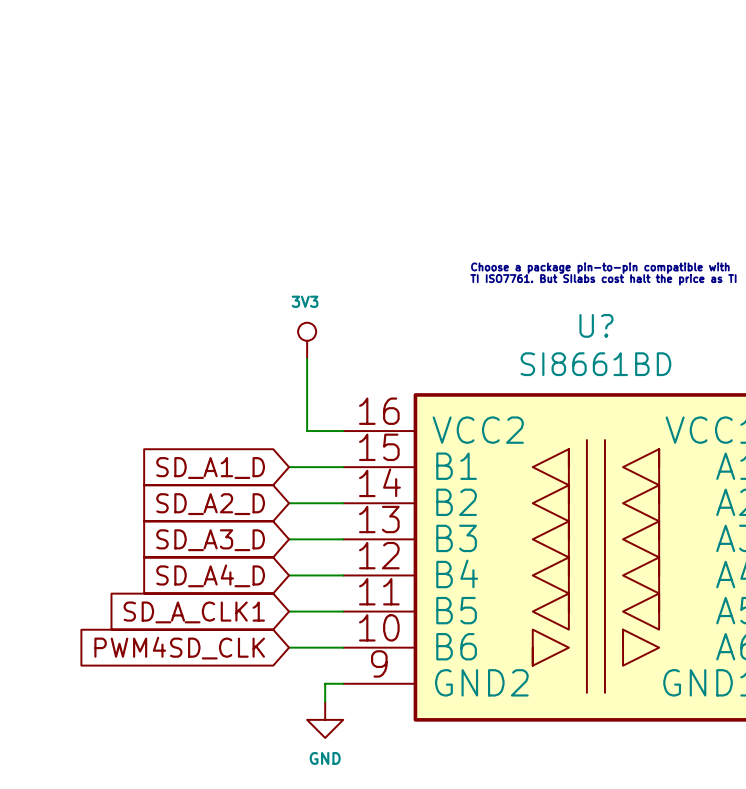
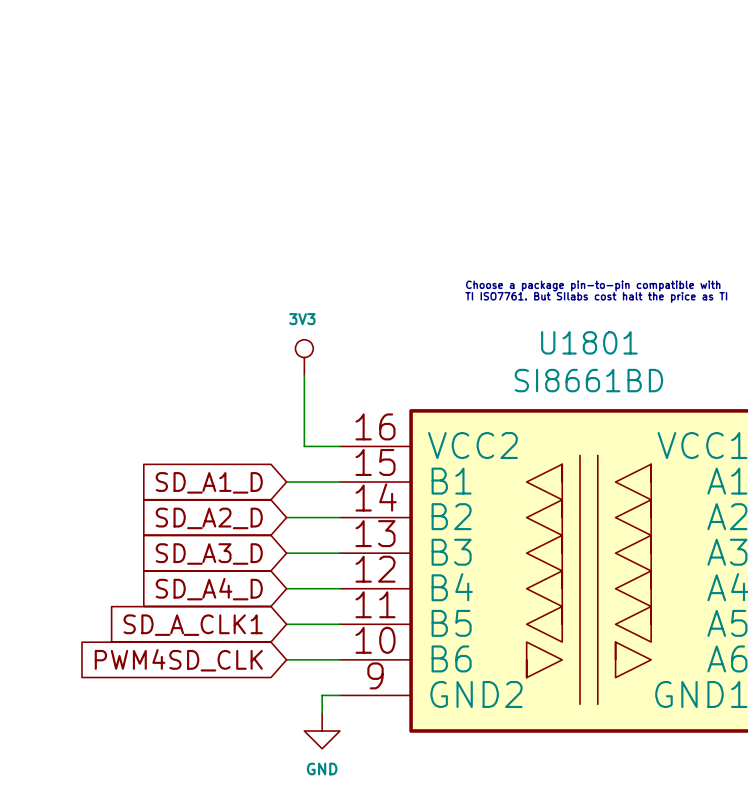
U? name: U? (596, 325) -> U1801 (589, 342)

